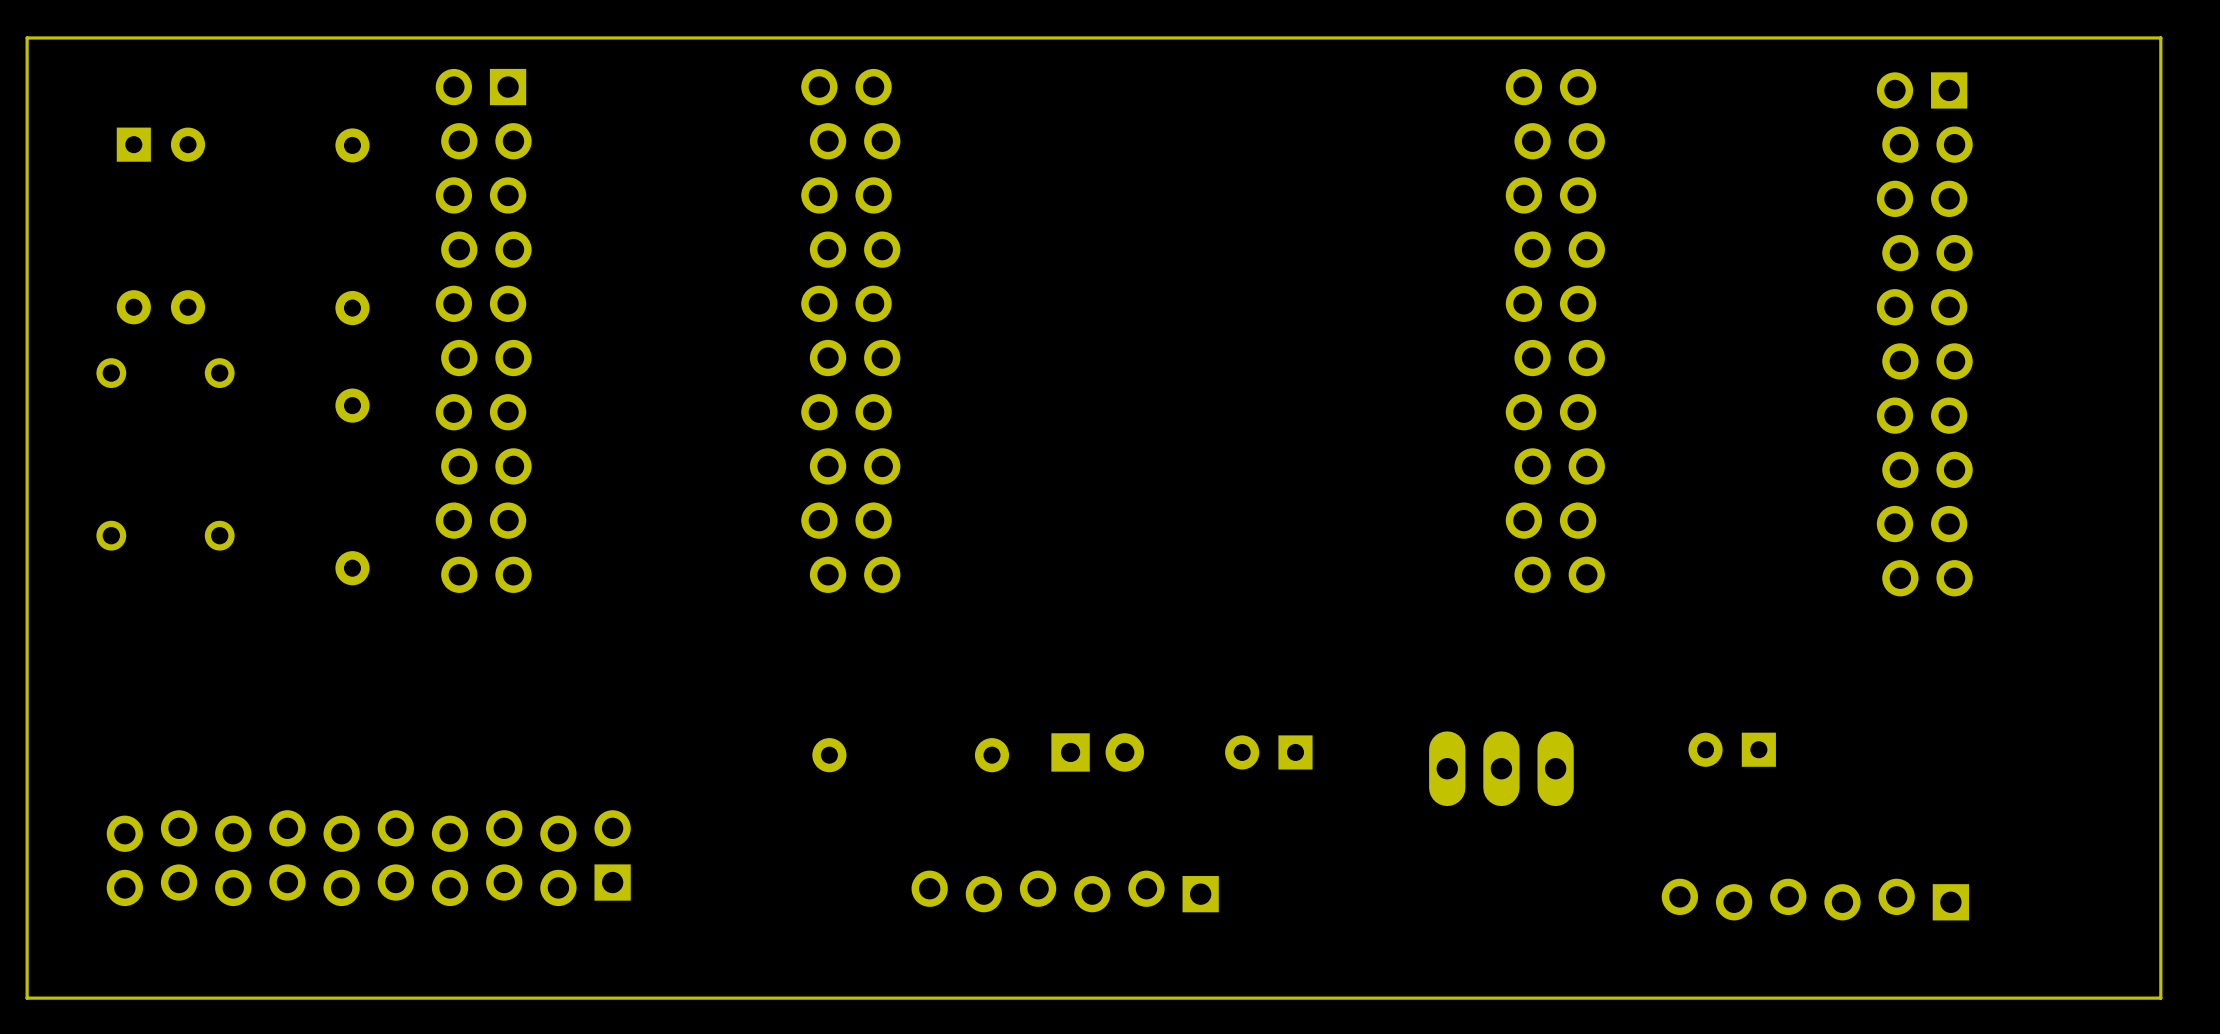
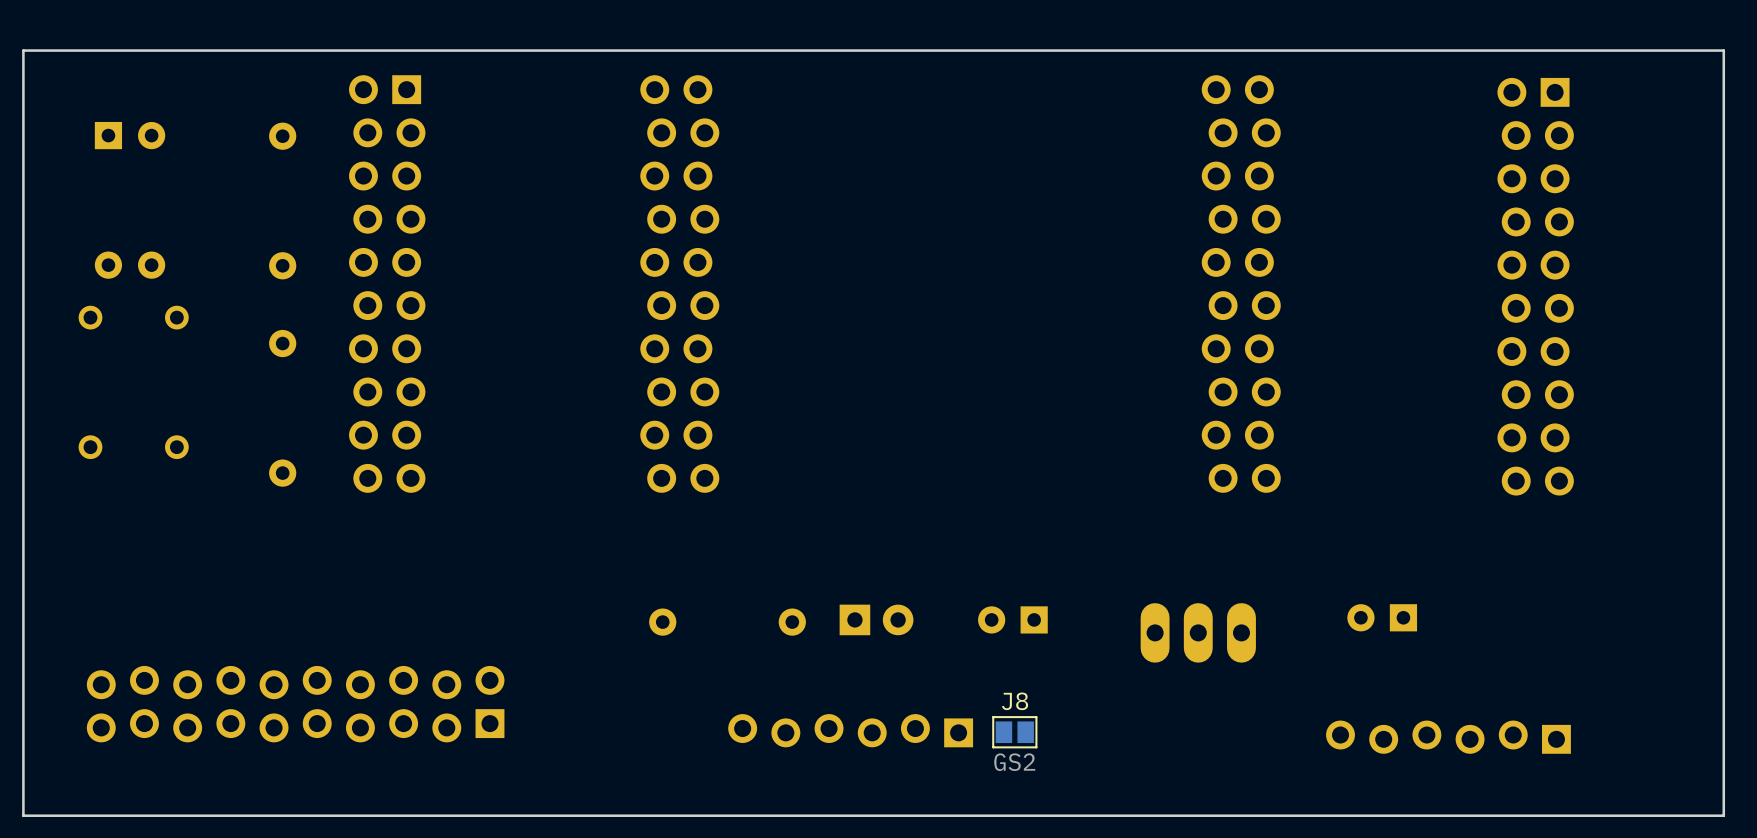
J8: none -> GS2 (1014, 732)

